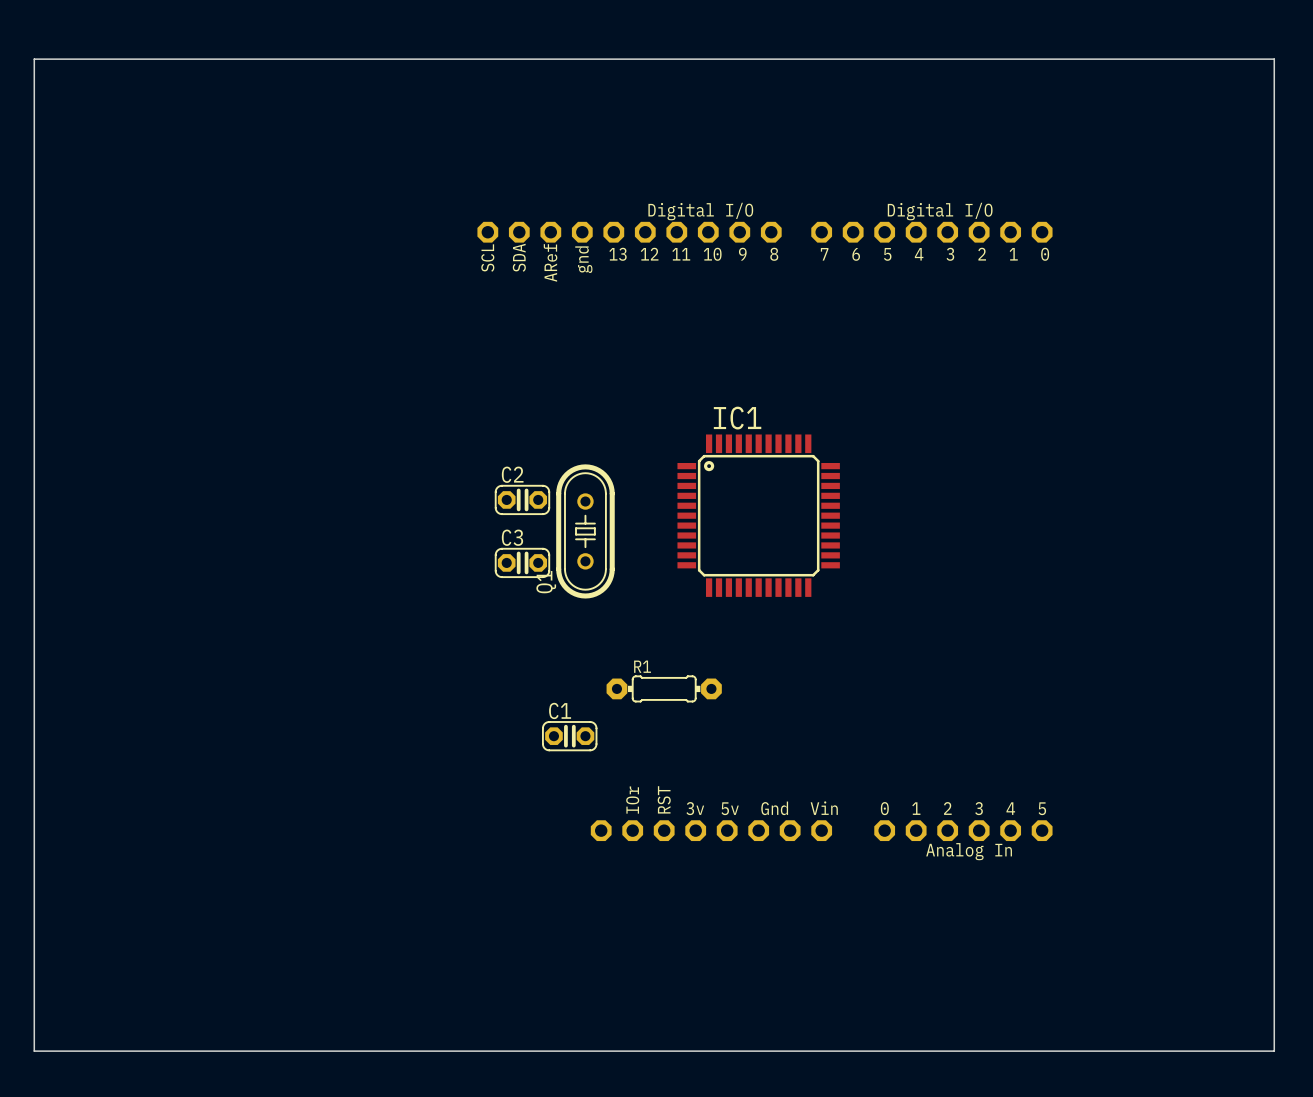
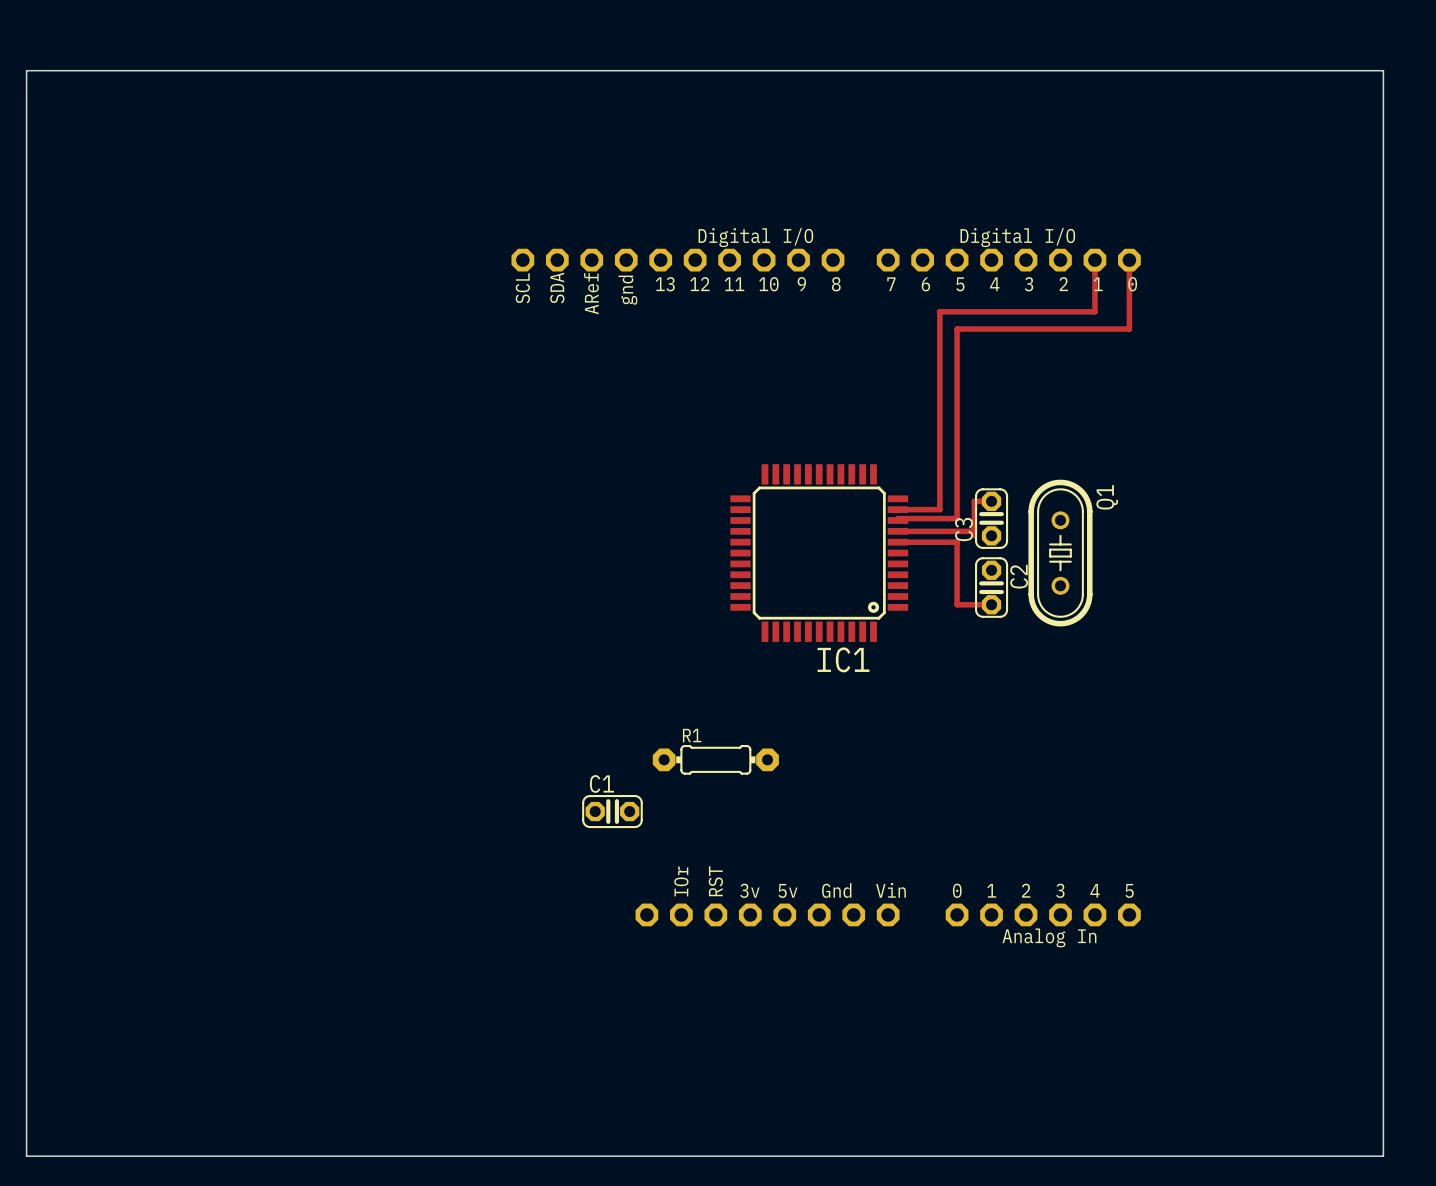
top track: none -> (1094, 260) (1094, 311) (939, 311) (939, 509) (897, 509)
top track: none -> (1129, 260) (1129, 329) (957, 329) (957, 518) (897, 518) (897, 520)
top track: none -> (991, 501) (974, 501) (974, 535)
top track: none -> (897, 531) (974, 531)
top track: none -> (897, 542) (957, 542) (957, 604) (991, 604)
C2 rotation: 0° (522, 499) -> 90° clockwise (991, 587)
C2 position: (522, 499) -> (991, 587)
IC1 rotation: 0° (758, 515) -> 180° (819, 553)
Q1 position: (585, 531) -> (1060, 553)
C3 rotation: 0° (522, 562) -> 90° counterclockwise (991, 518)
C3 position: (522, 562) -> (991, 518)
Q1 name position: Q1 (546, 582) -> Q1 (1107, 497)

